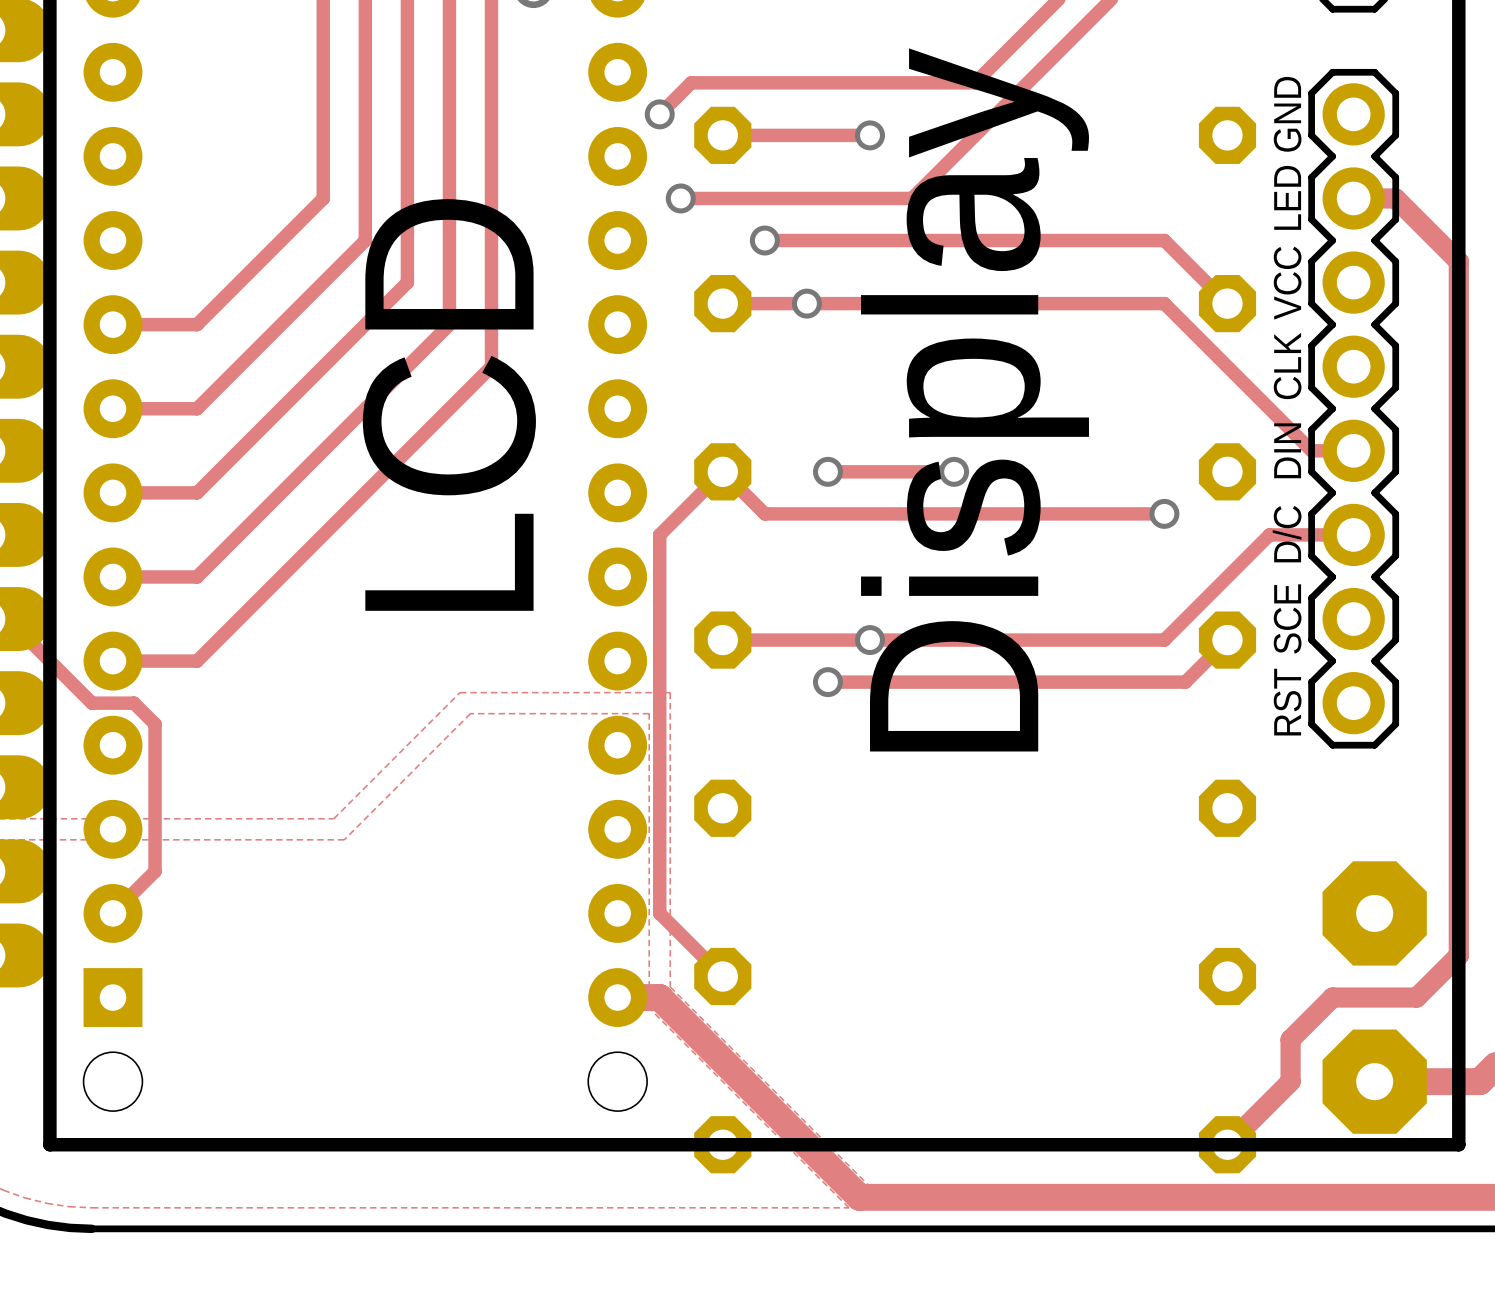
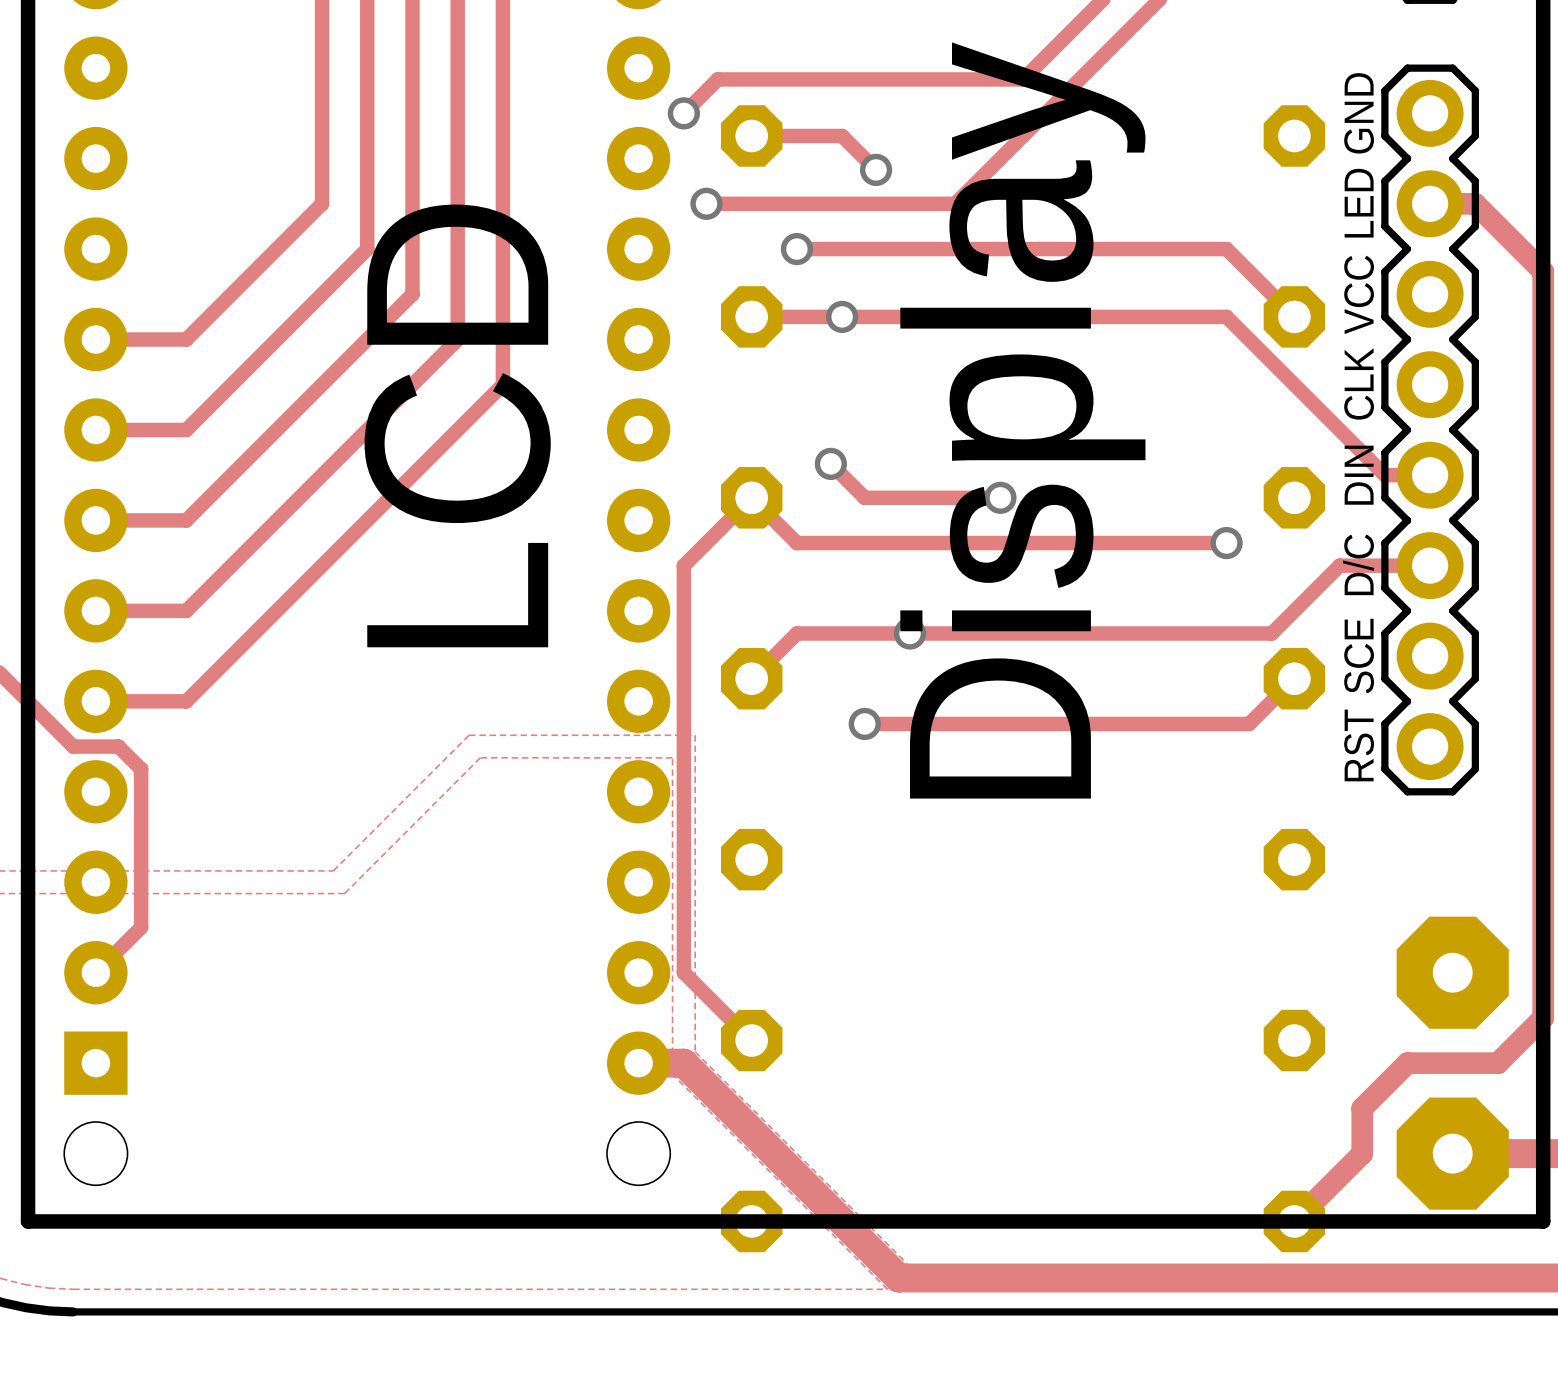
track: (806, 135) (870, 135) -> (842, 135) (876, 169)
via position: (870, 135) -> (876, 169)
track: none -> (830, 463) (864, 497)
via position: (827, 471) -> (830, 463)
track: (1206, 598) (1164, 640) (722, 640) -> (1271, 633) (796, 633) (751, 678)
via position: (870, 640) -> (910, 633)

